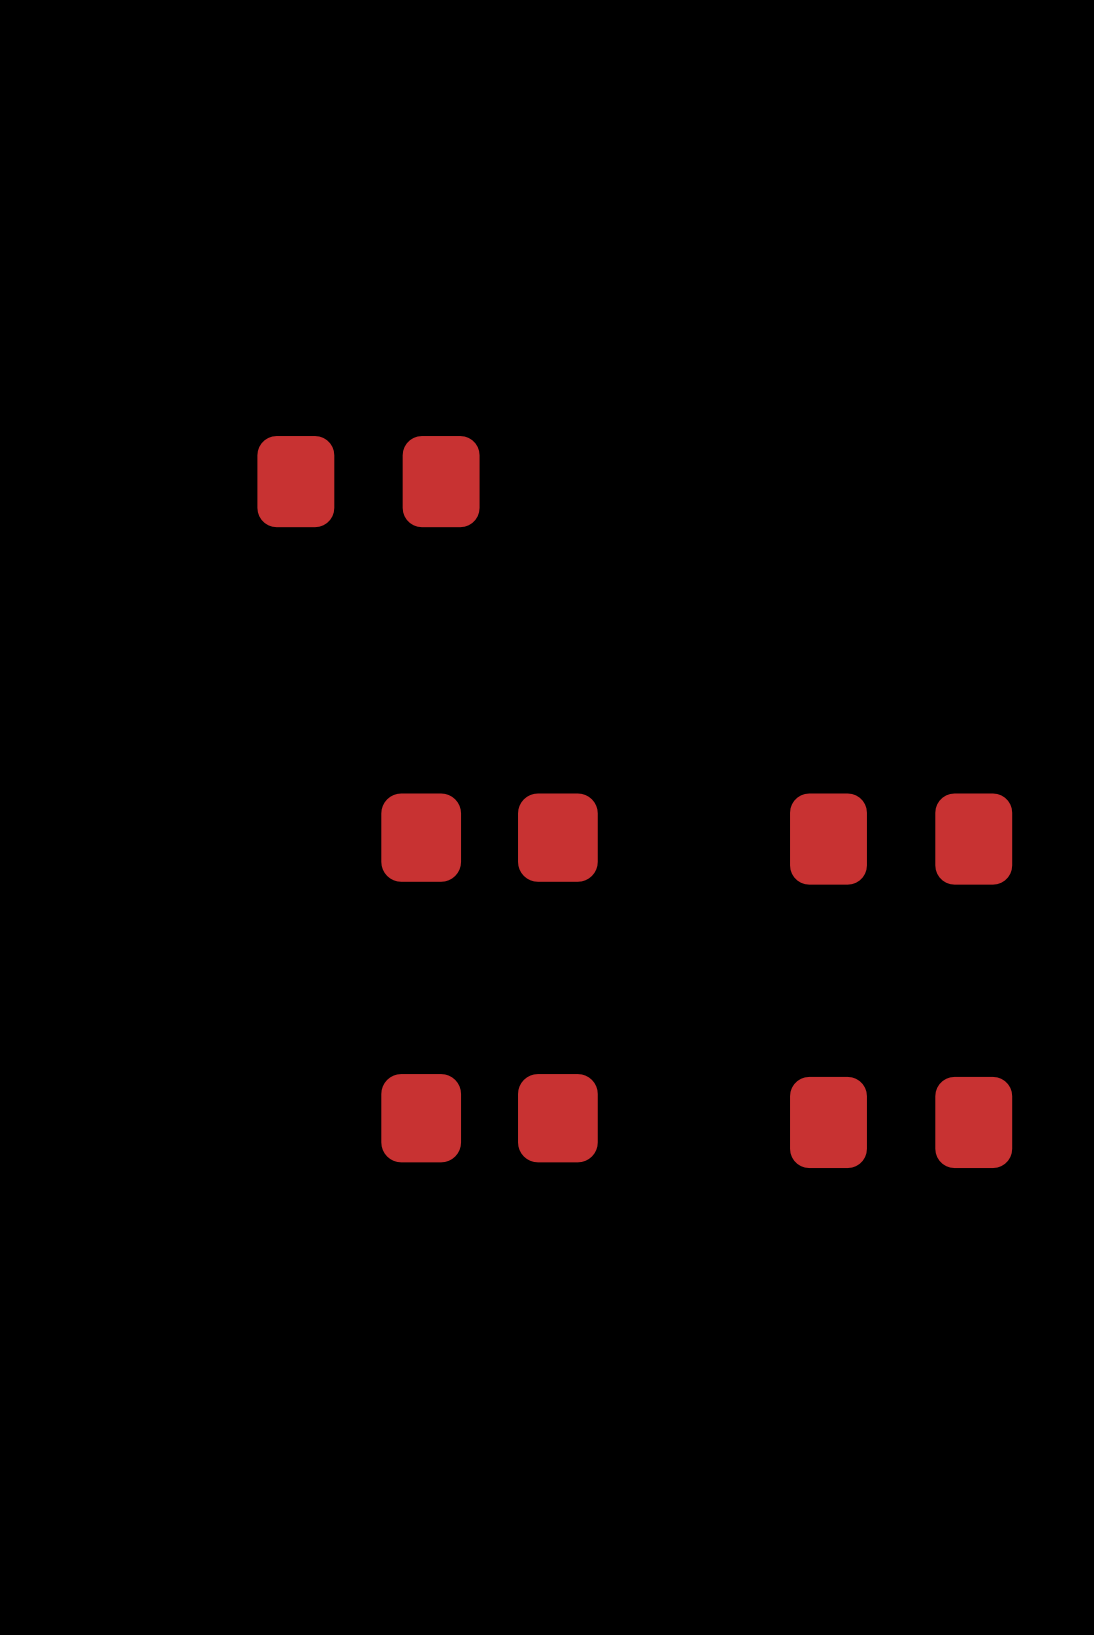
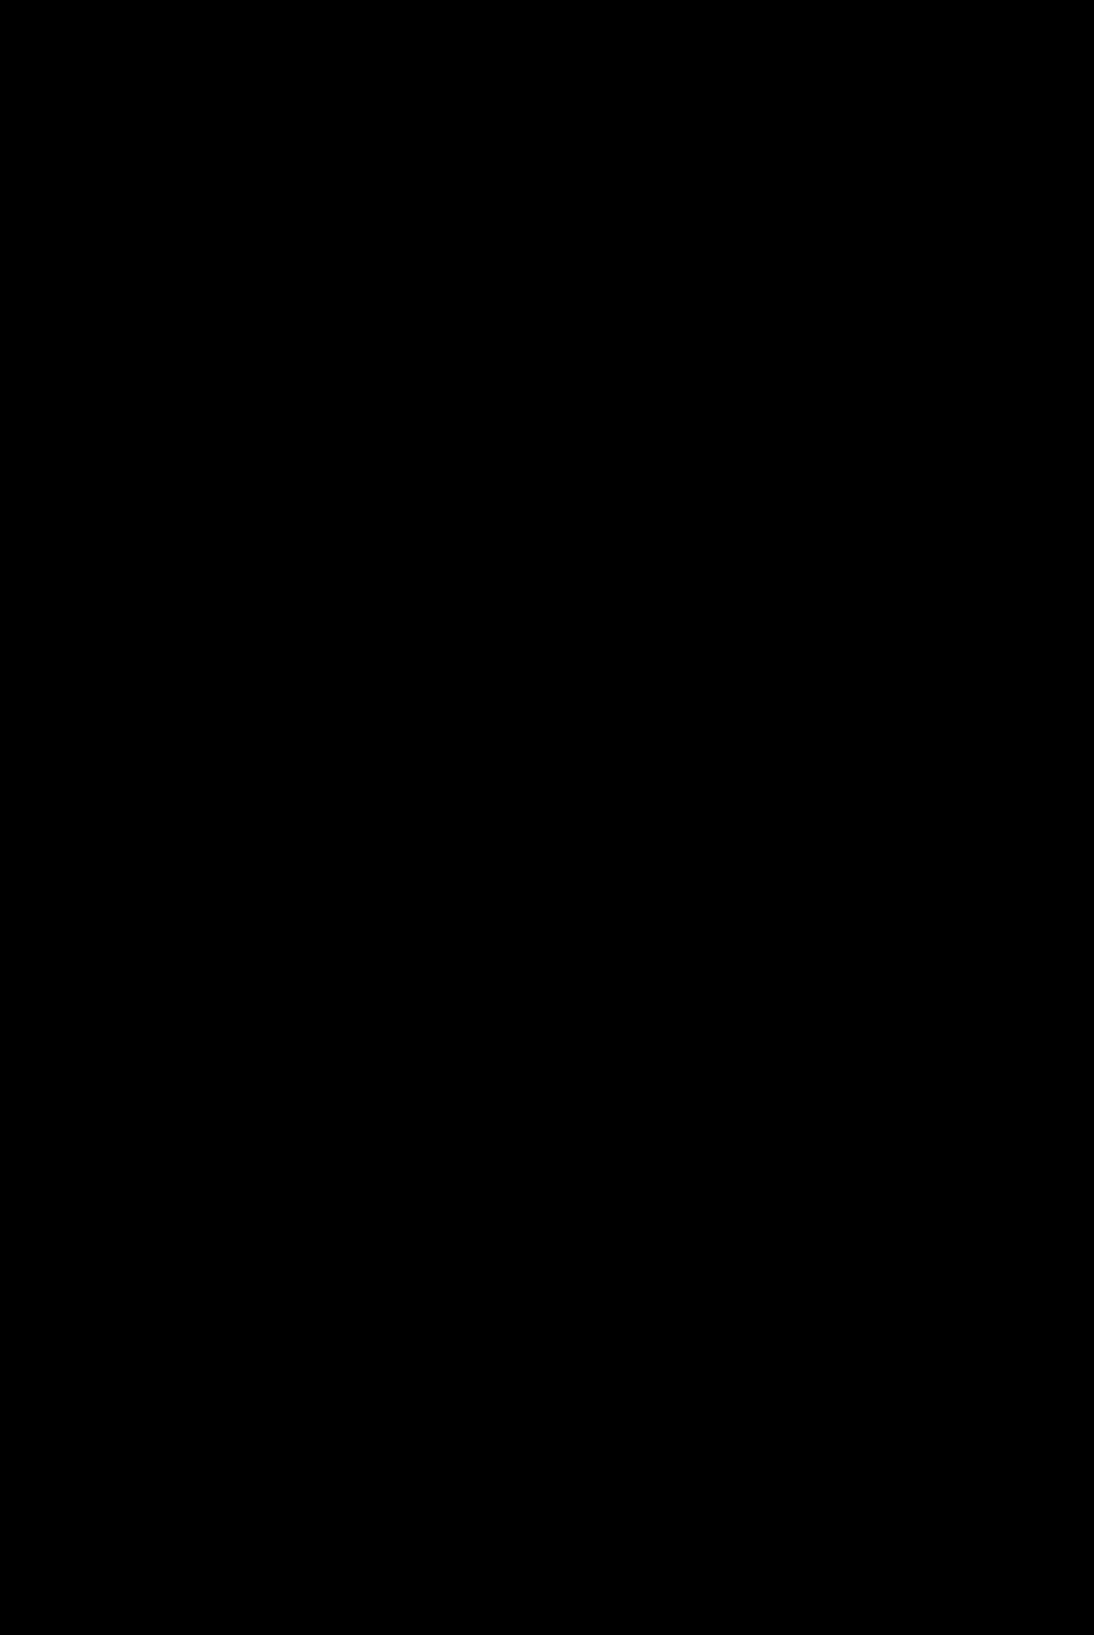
part: (368, 481) -> none
part: (489, 837) -> none
part: (901, 839) -> none
part: (489, 1118) -> none
part: (901, 1122) -> none

